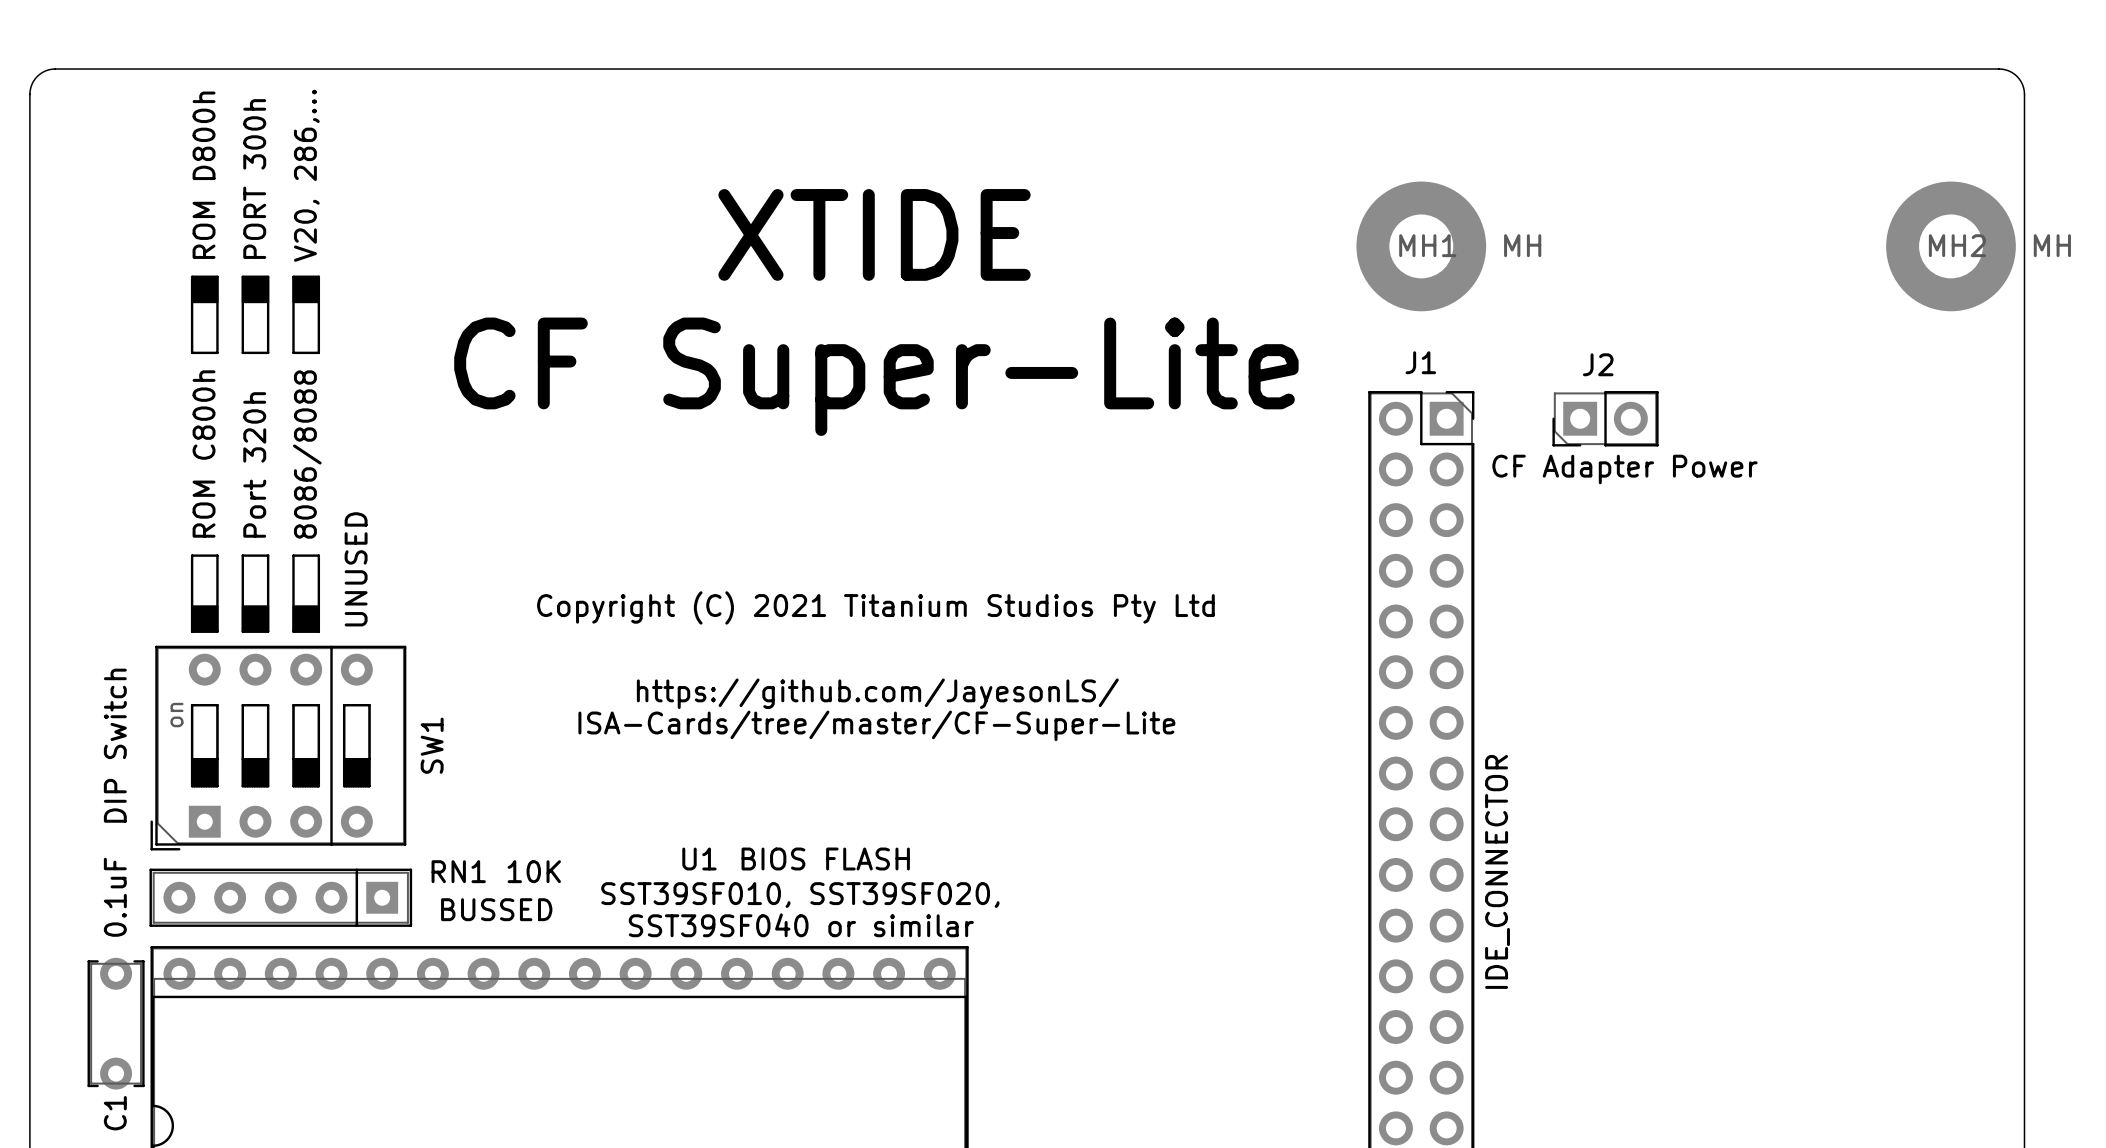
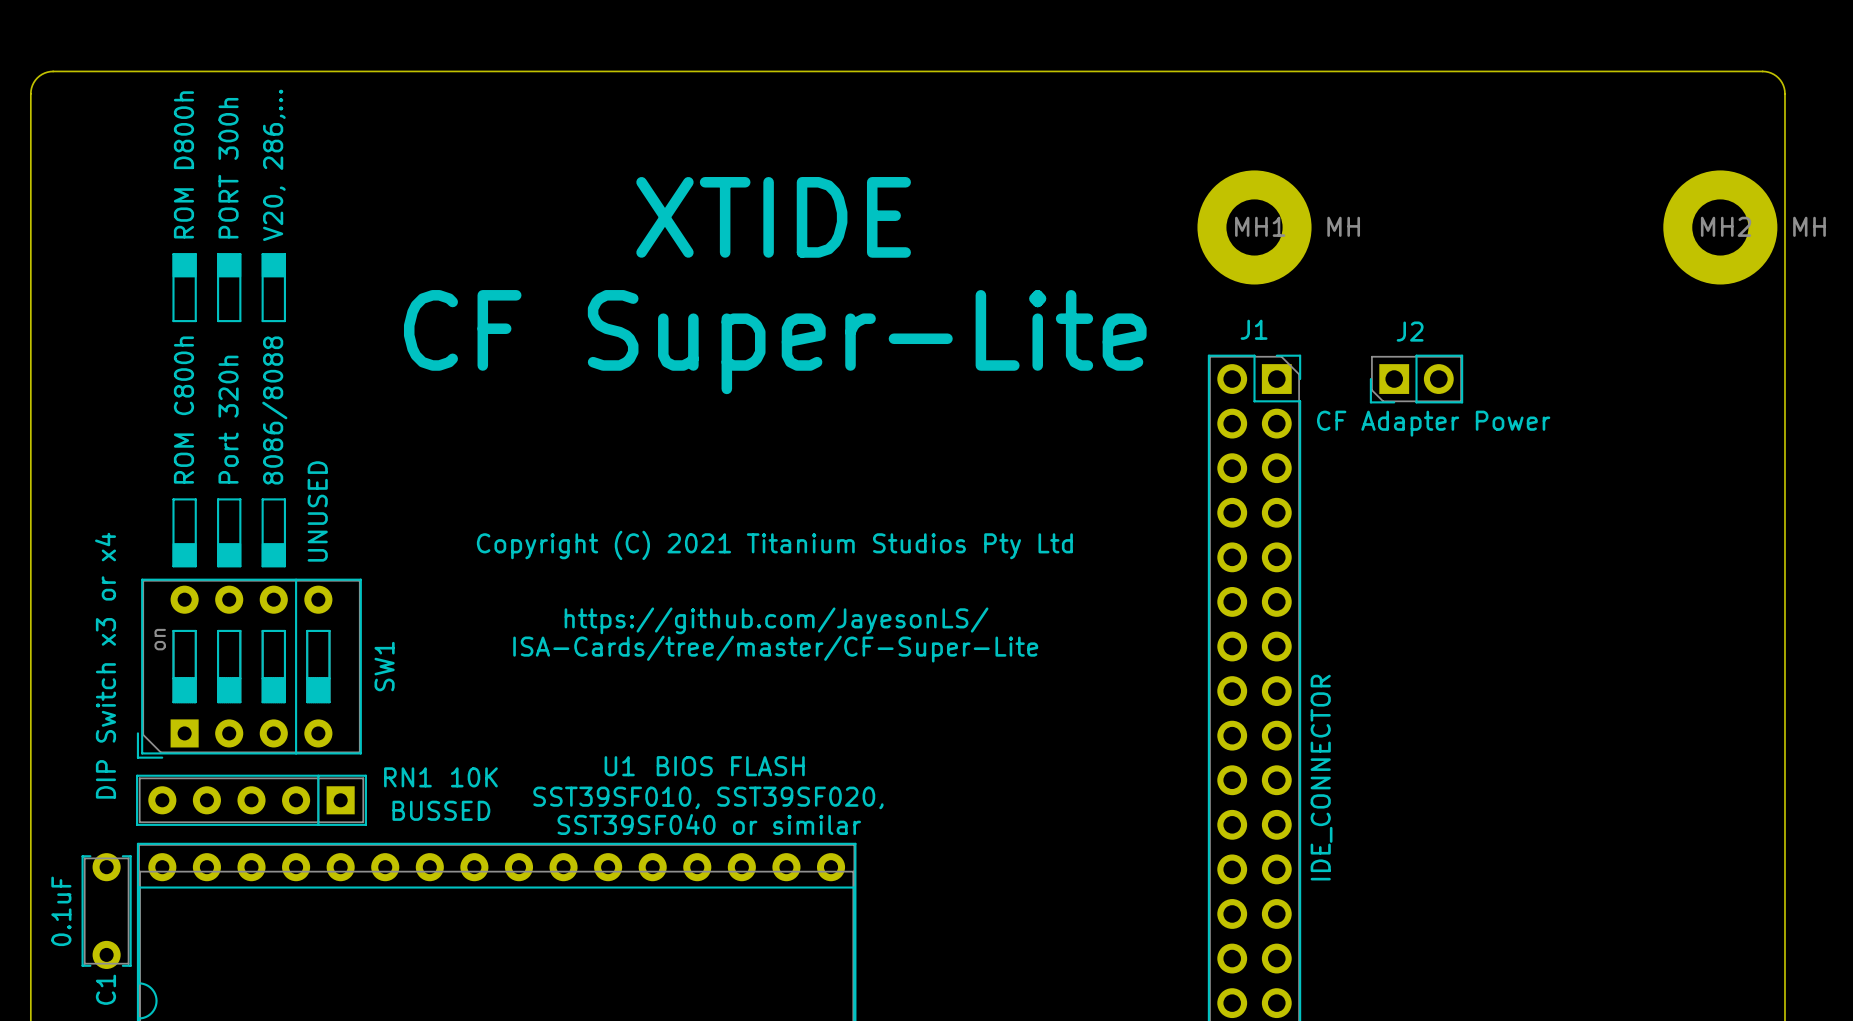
SW1 value: DIP Switch (115, 745) -> DIP Switch x3 or x4 (105, 665)
C1 value position: 0.1uF (115, 897) -> 0.1uF (61, 911)

